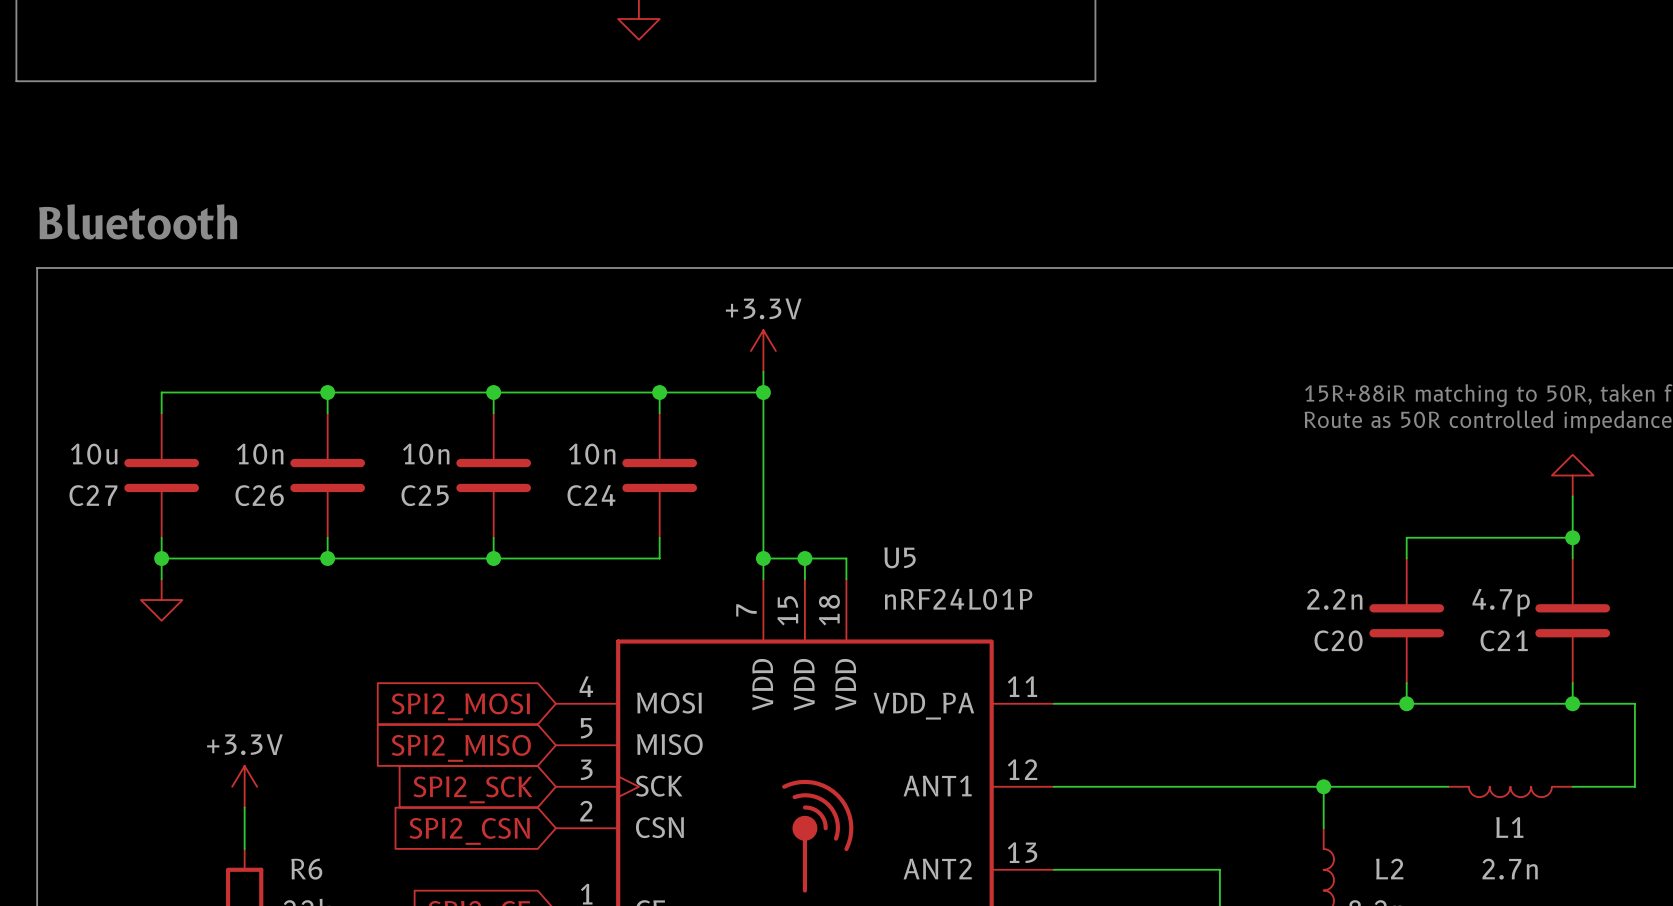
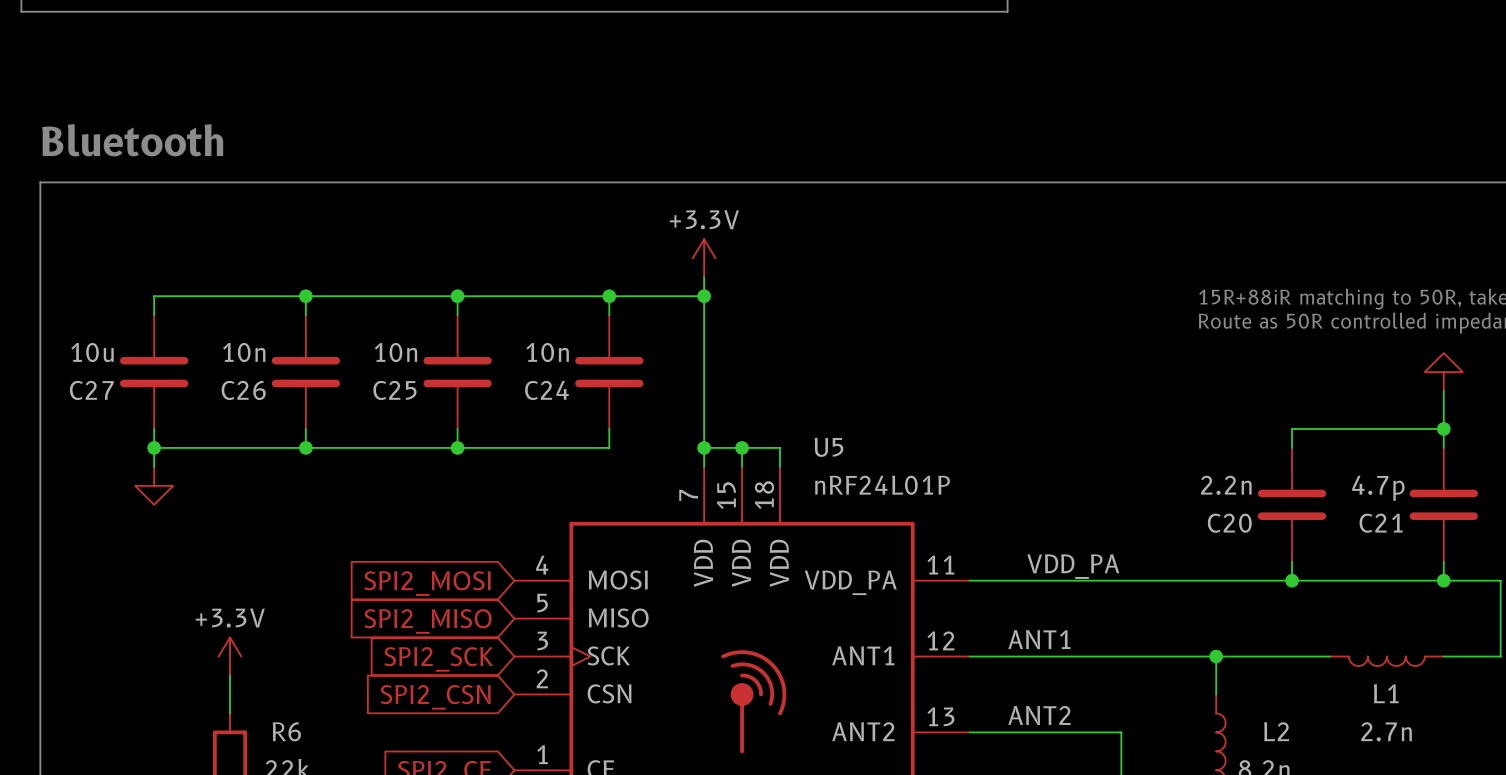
label: none -> VDD_PA (1073, 566)
label: none -> ANT1 (1039, 639)
label: none -> ANT2 (1039, 715)

